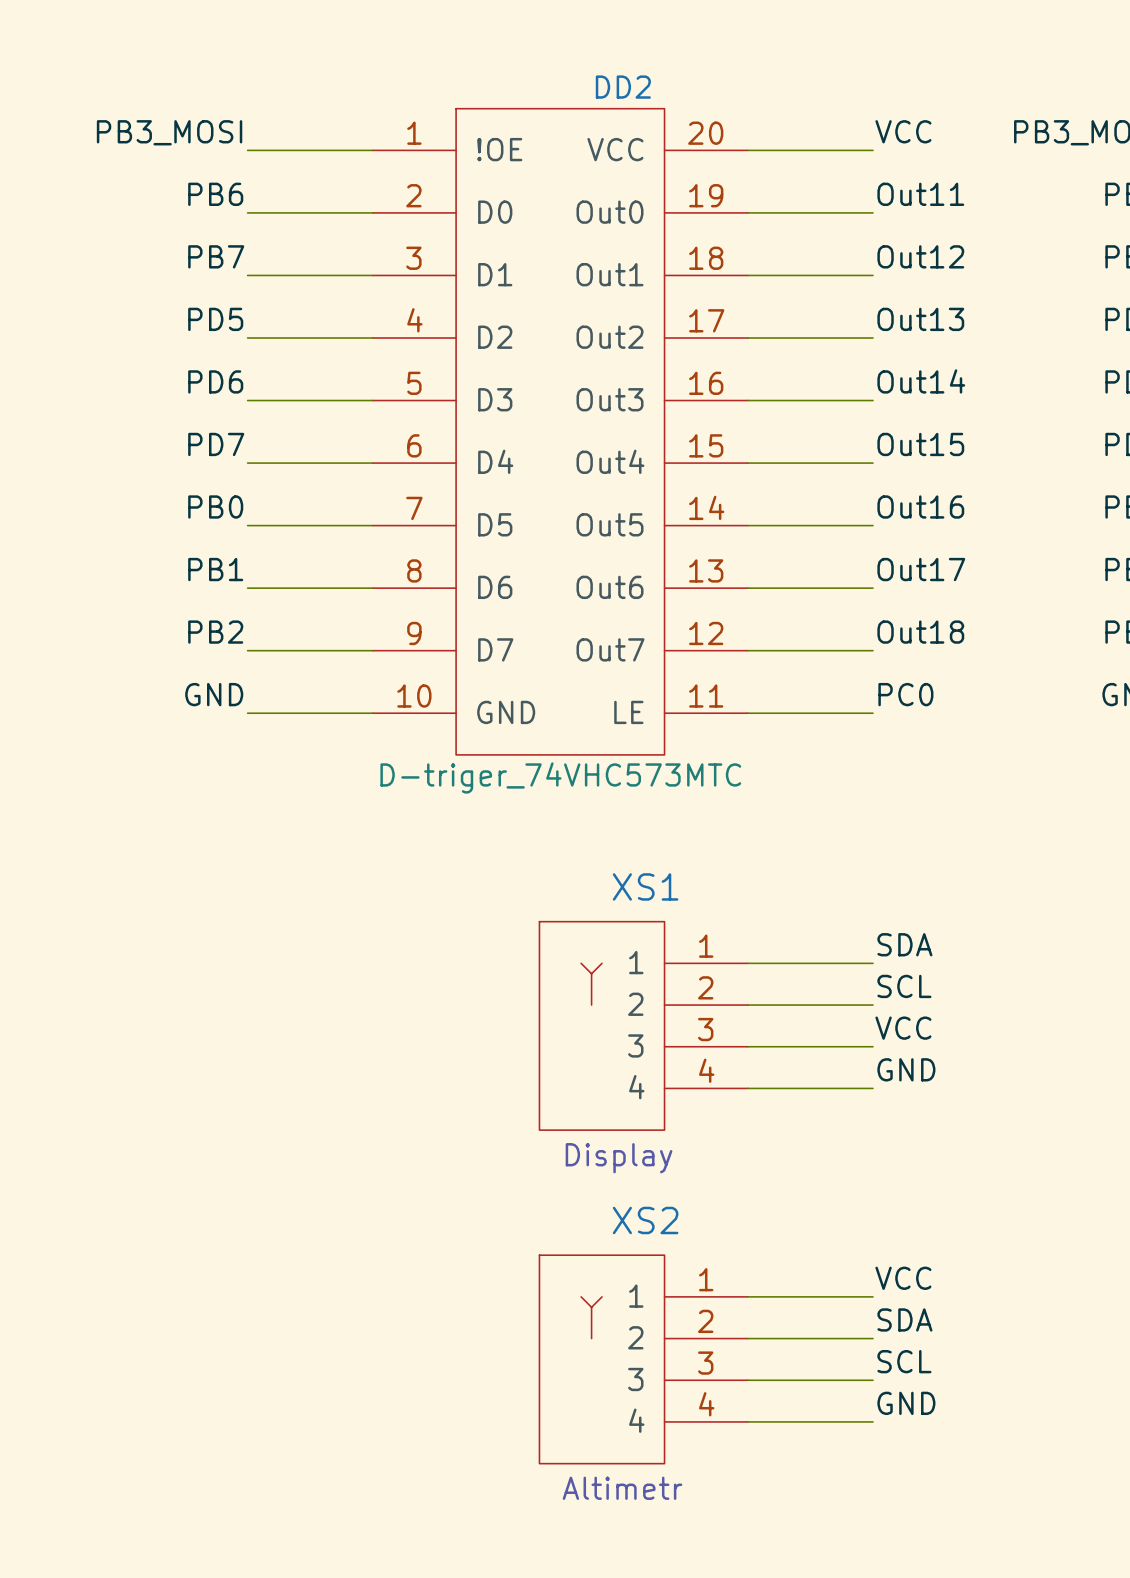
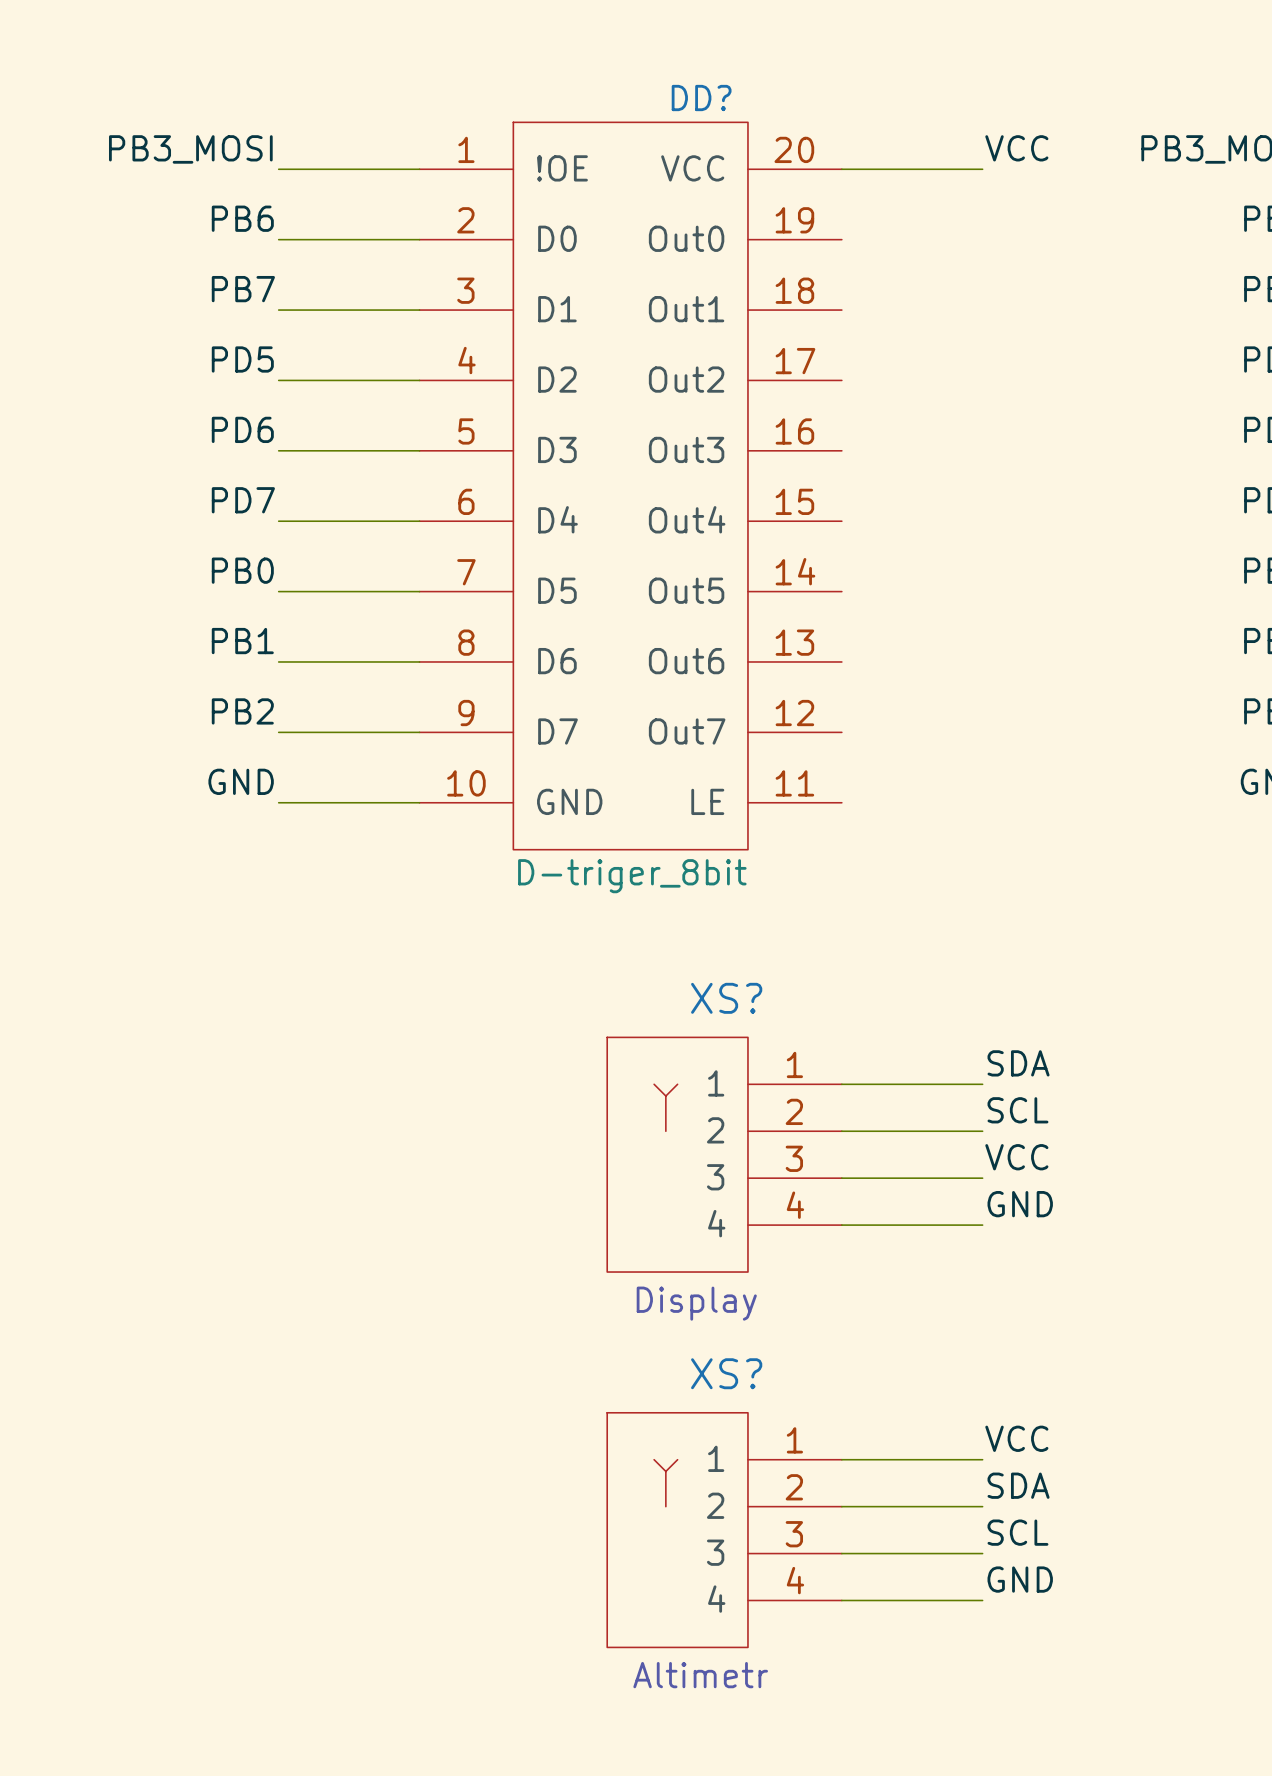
DD2 name: DD2 (623, 87) -> DD? (701, 98)
label: Out11 (920, 194) -> none
wire: (747, 212) (872, 212) -> none
label: Out12 (920, 256) -> none
wire: (747, 275) (872, 275) -> none
label: Out13 (920, 319) -> none
wire: (747, 337) (872, 337) -> none
label: Out14 (921, 381) -> none
wire: (747, 400) (872, 400) -> none
label: Out15 (920, 444) -> none
wire: (747, 463) (872, 463) -> none
label: Out16 (920, 507) -> none
wire: (747, 525) (872, 525) -> none
label: Out17 (921, 569) -> none
wire: (747, 588) (872, 588) -> none
label: Out18 (920, 632) -> none
wire: (747, 650) (872, 650) -> none
label: PC0 (905, 694) -> none
wire: (747, 713) (872, 713) -> none
DD2 value: D-triger_74VHC573MTC (560, 777) -> D-triger_8bit (632, 876)
XS1 name: XS1 (645, 886) -> XS? (726, 998)
XS2 name: XS2 (645, 1220) -> XS? (726, 1373)

